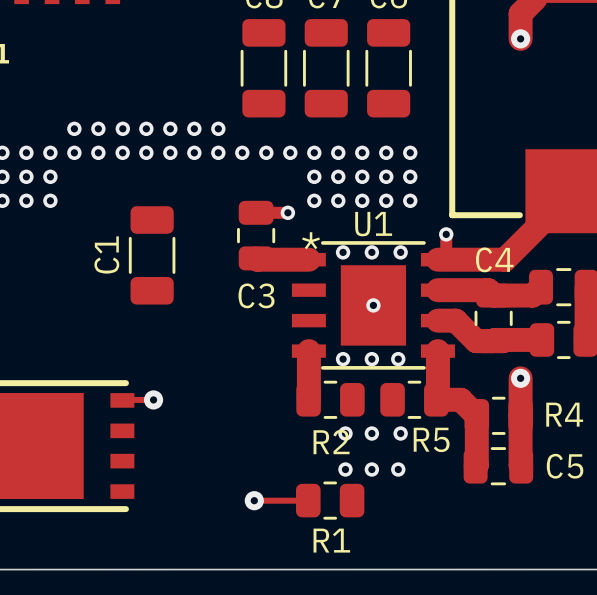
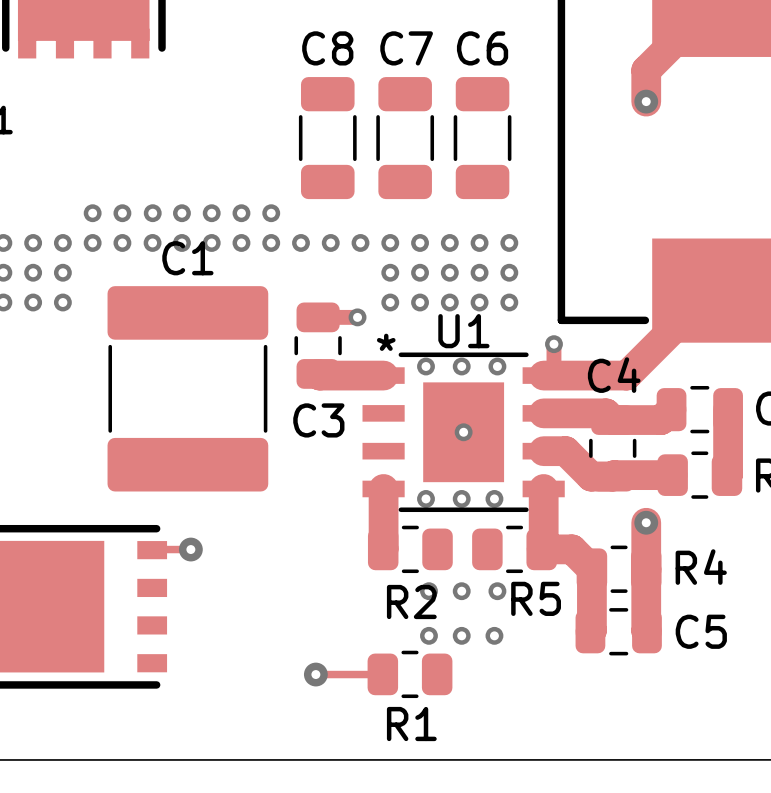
C1 footprint: [128, 206, 176, 305] -> [107, 286, 269, 492]
C1 name position: C1 (106, 254) -> C1 (187, 258)

